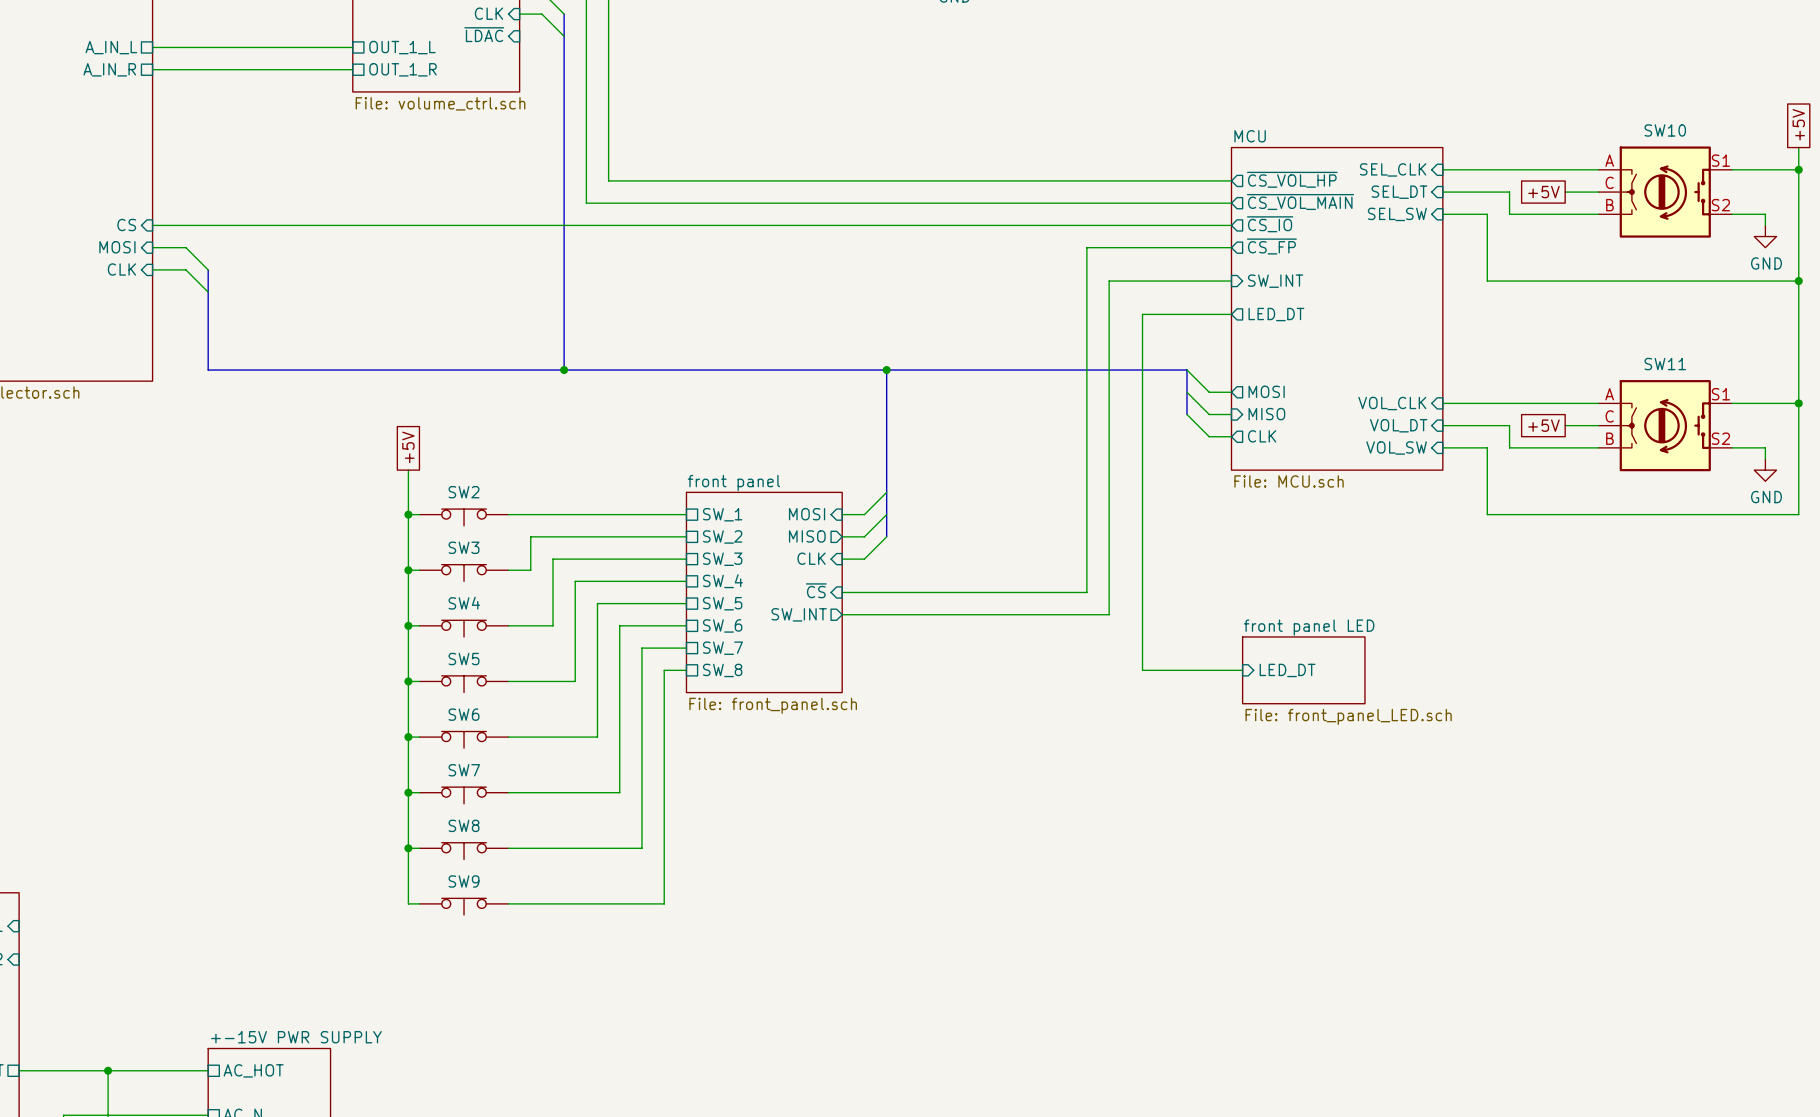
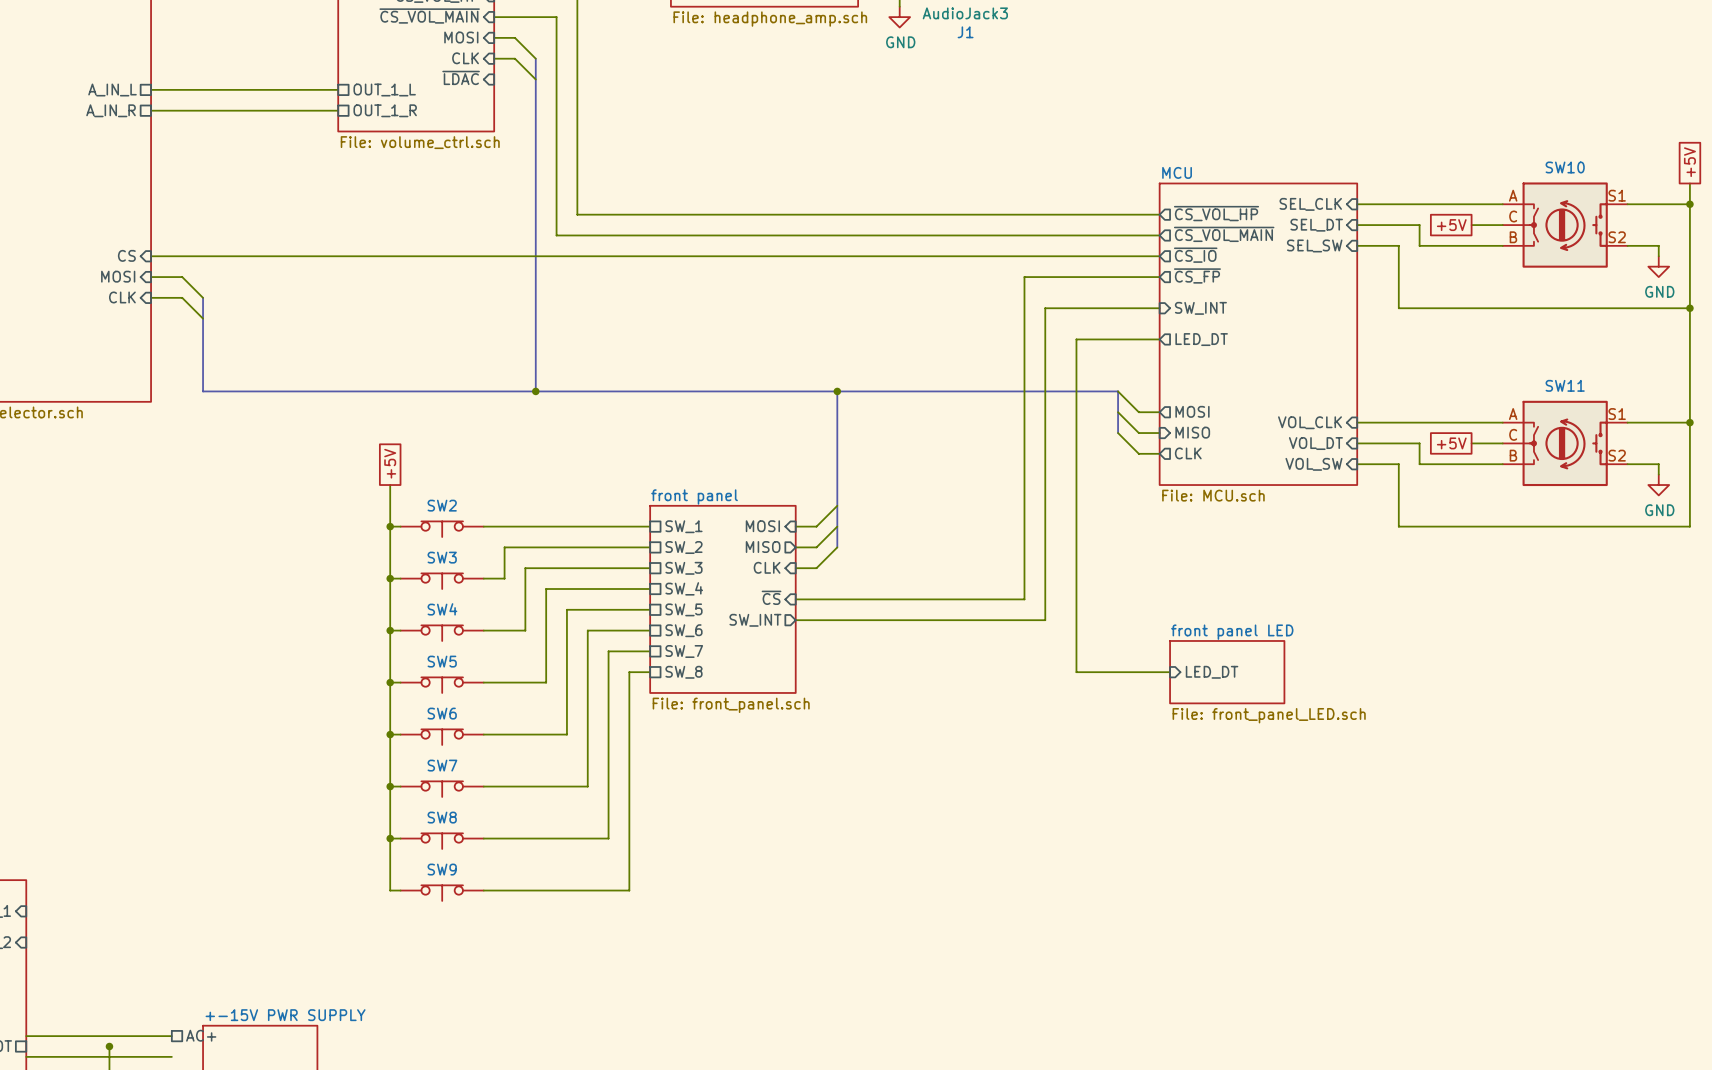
wire: none -> (26, 1036) (171, 1036)
sheet pin: none -> AC+ (201, 1035)
wire: (19, 1070) (208, 1070) -> none
sheet pin: AC_HOT (253, 1070) -> none
wire: none -> (26, 1056) (171, 1056)

